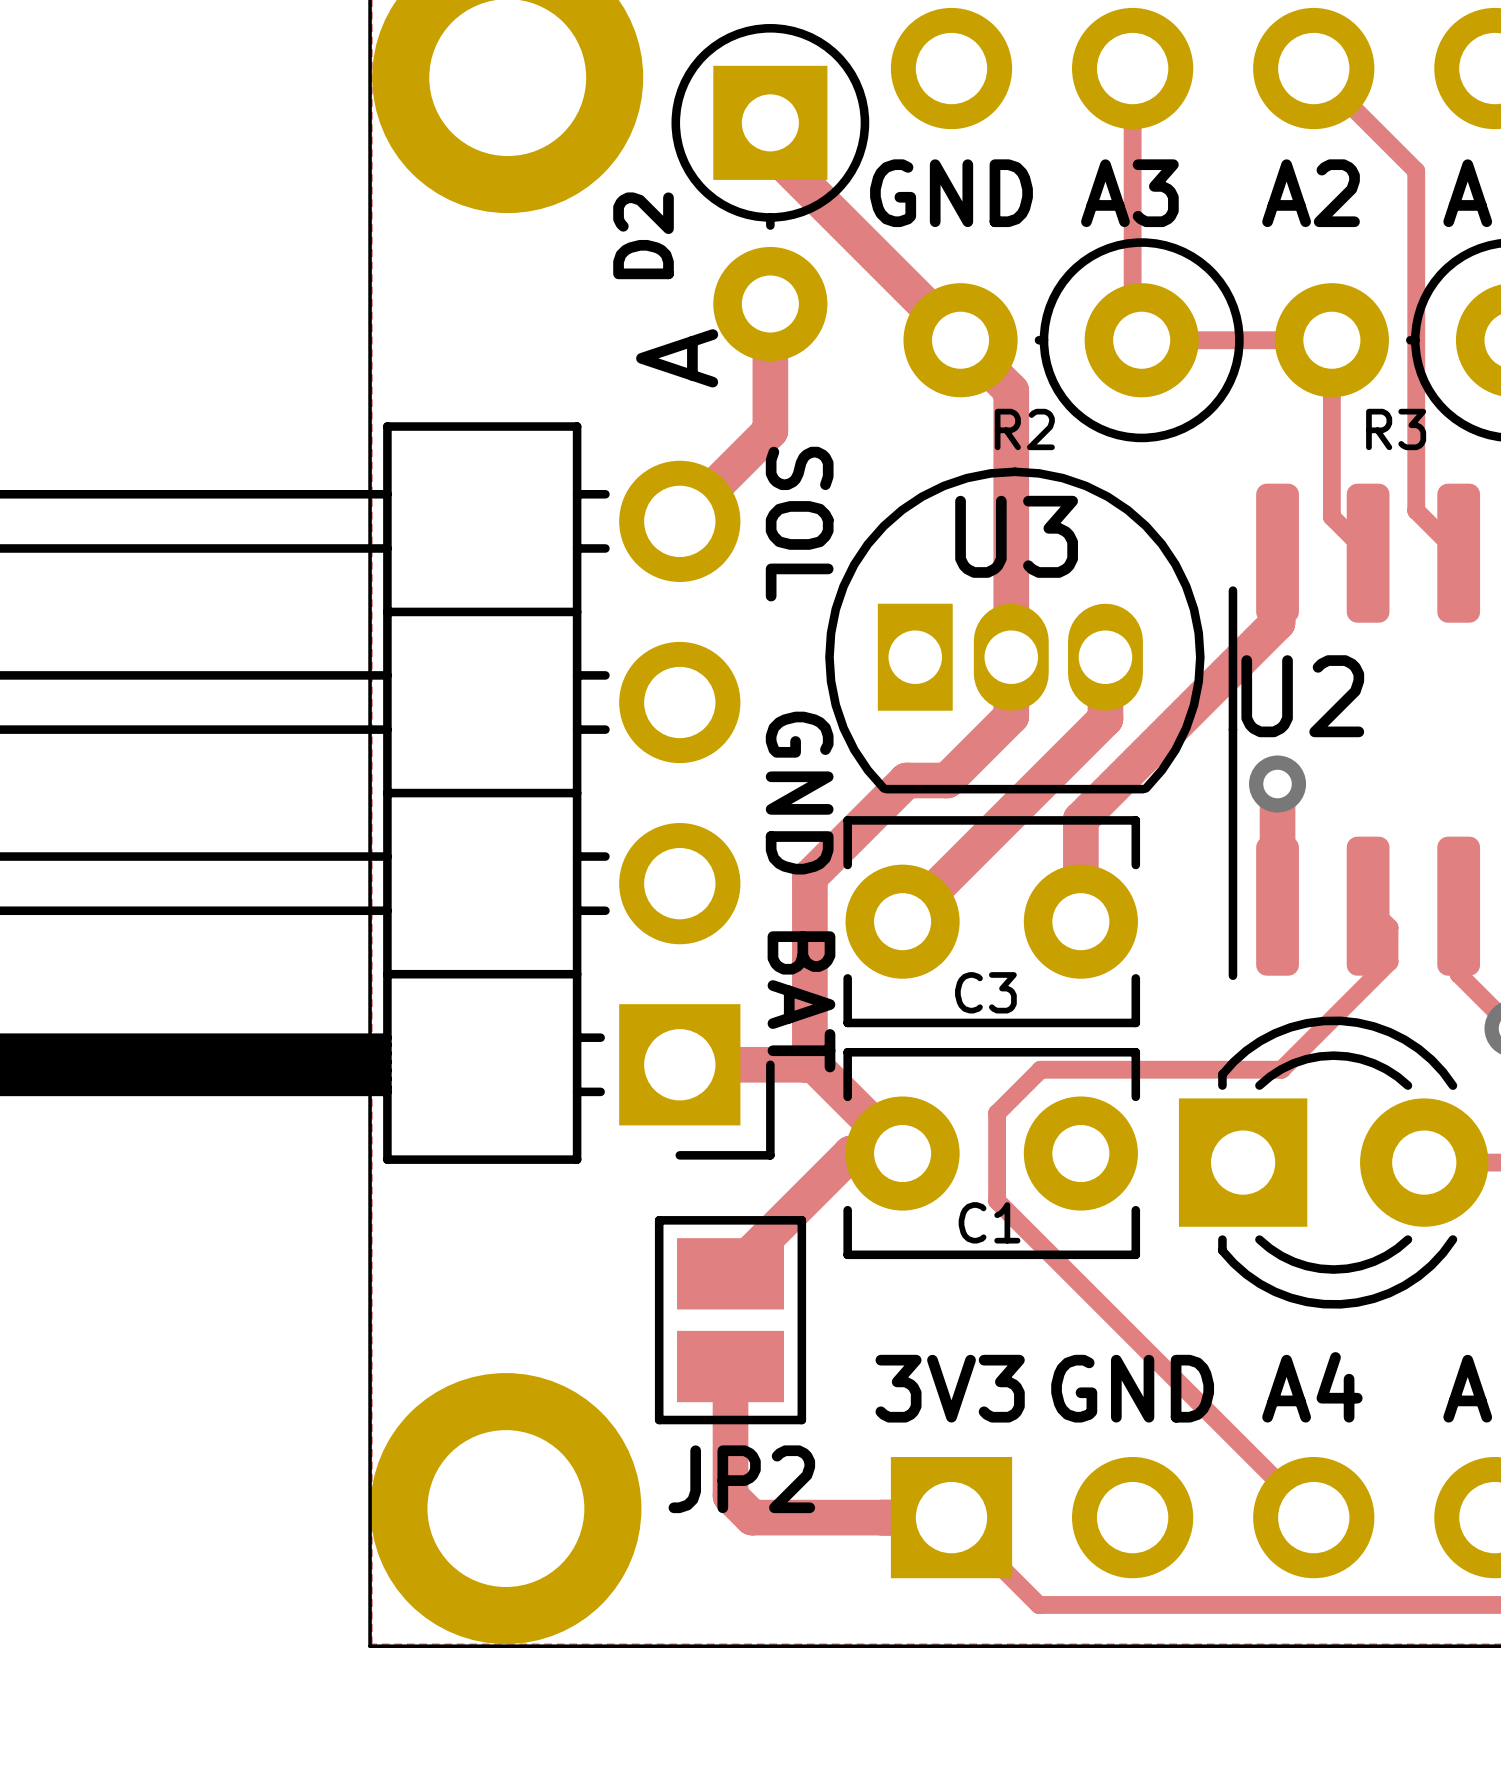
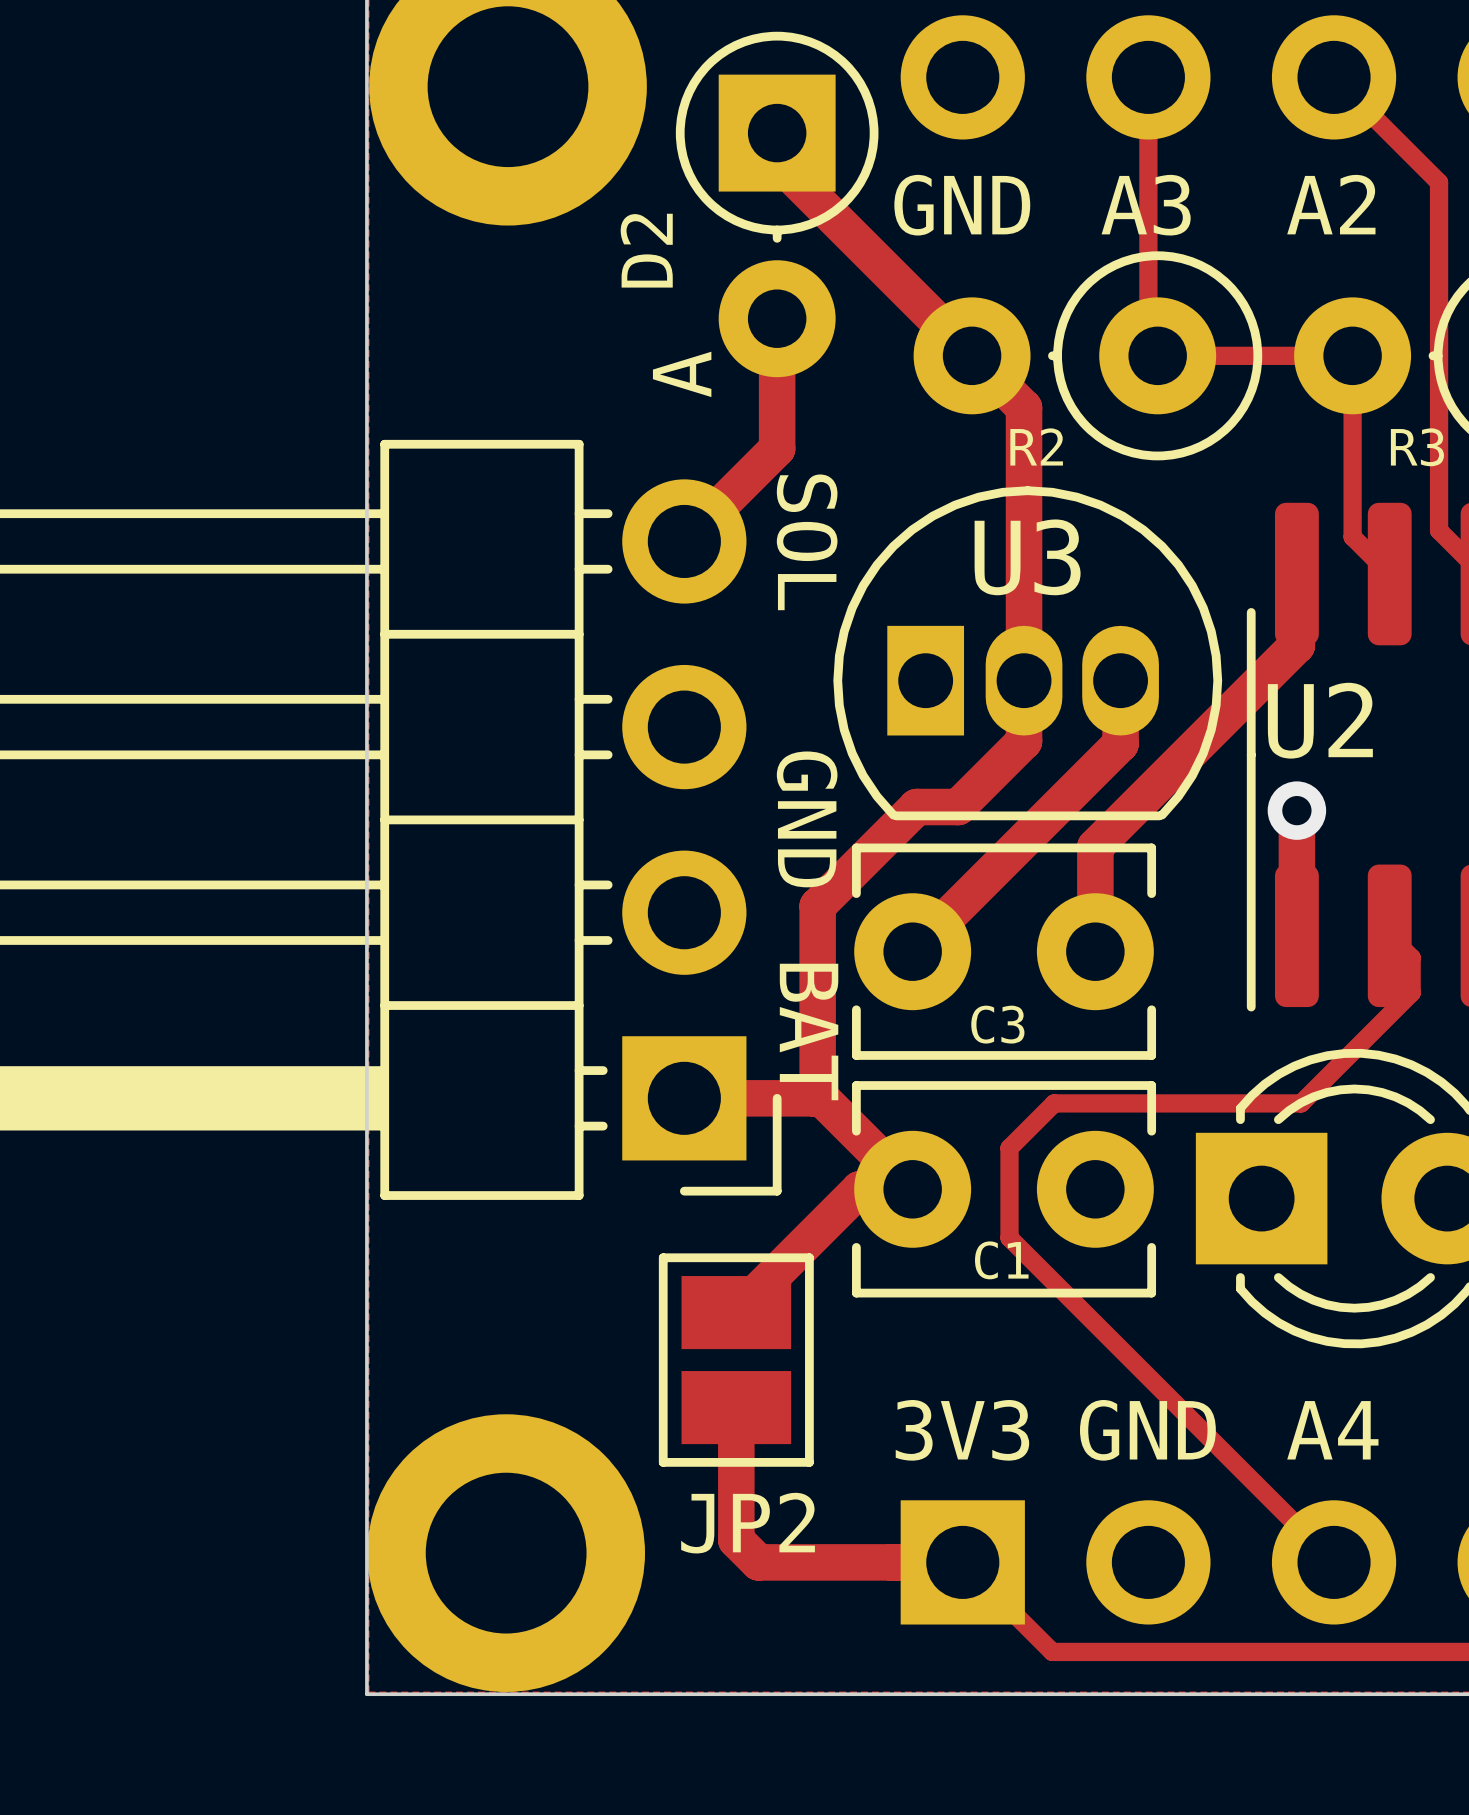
D2 footprint: [671, 24, 870, 362] -> [675, 31, 879, 378]

